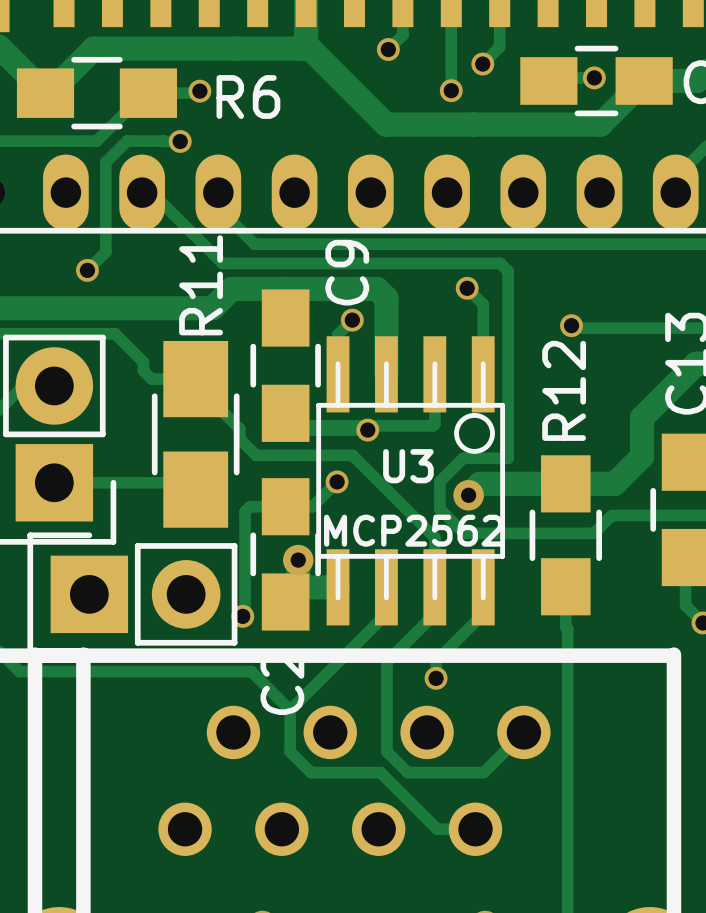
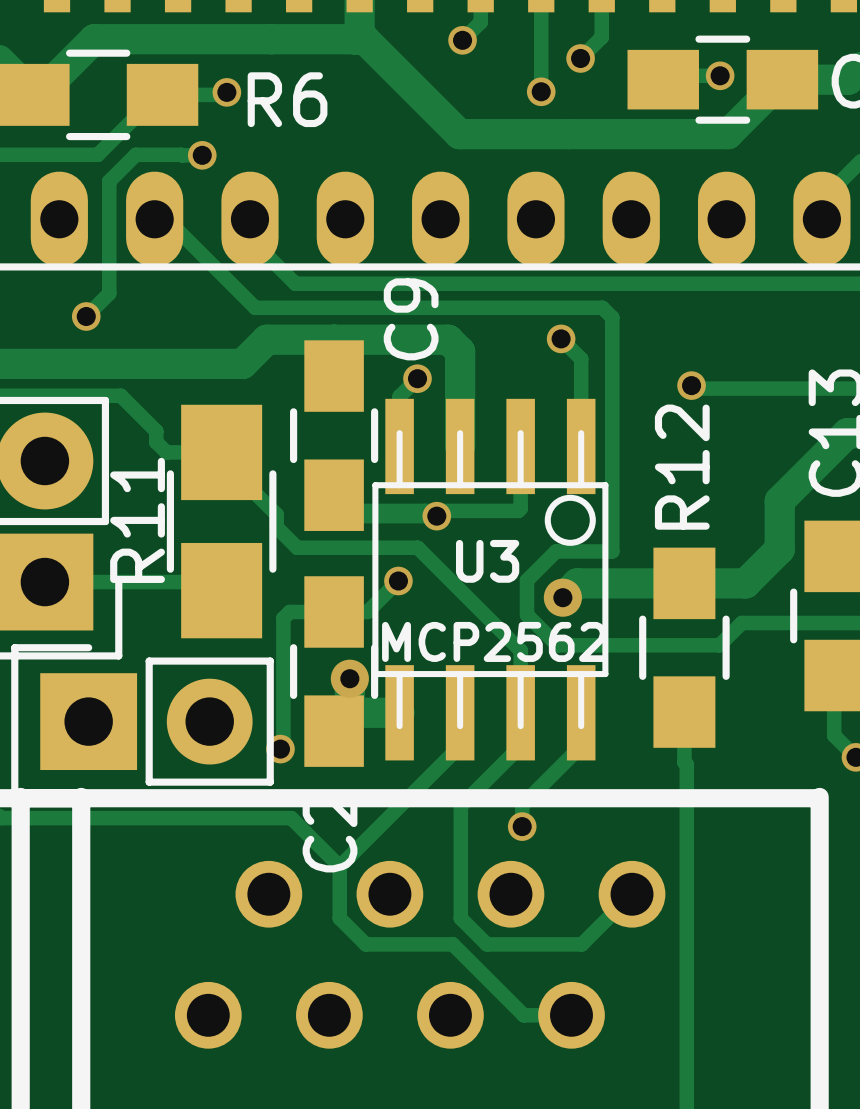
R11 name position: R11 (201, 285) -> R11 (137, 520)

